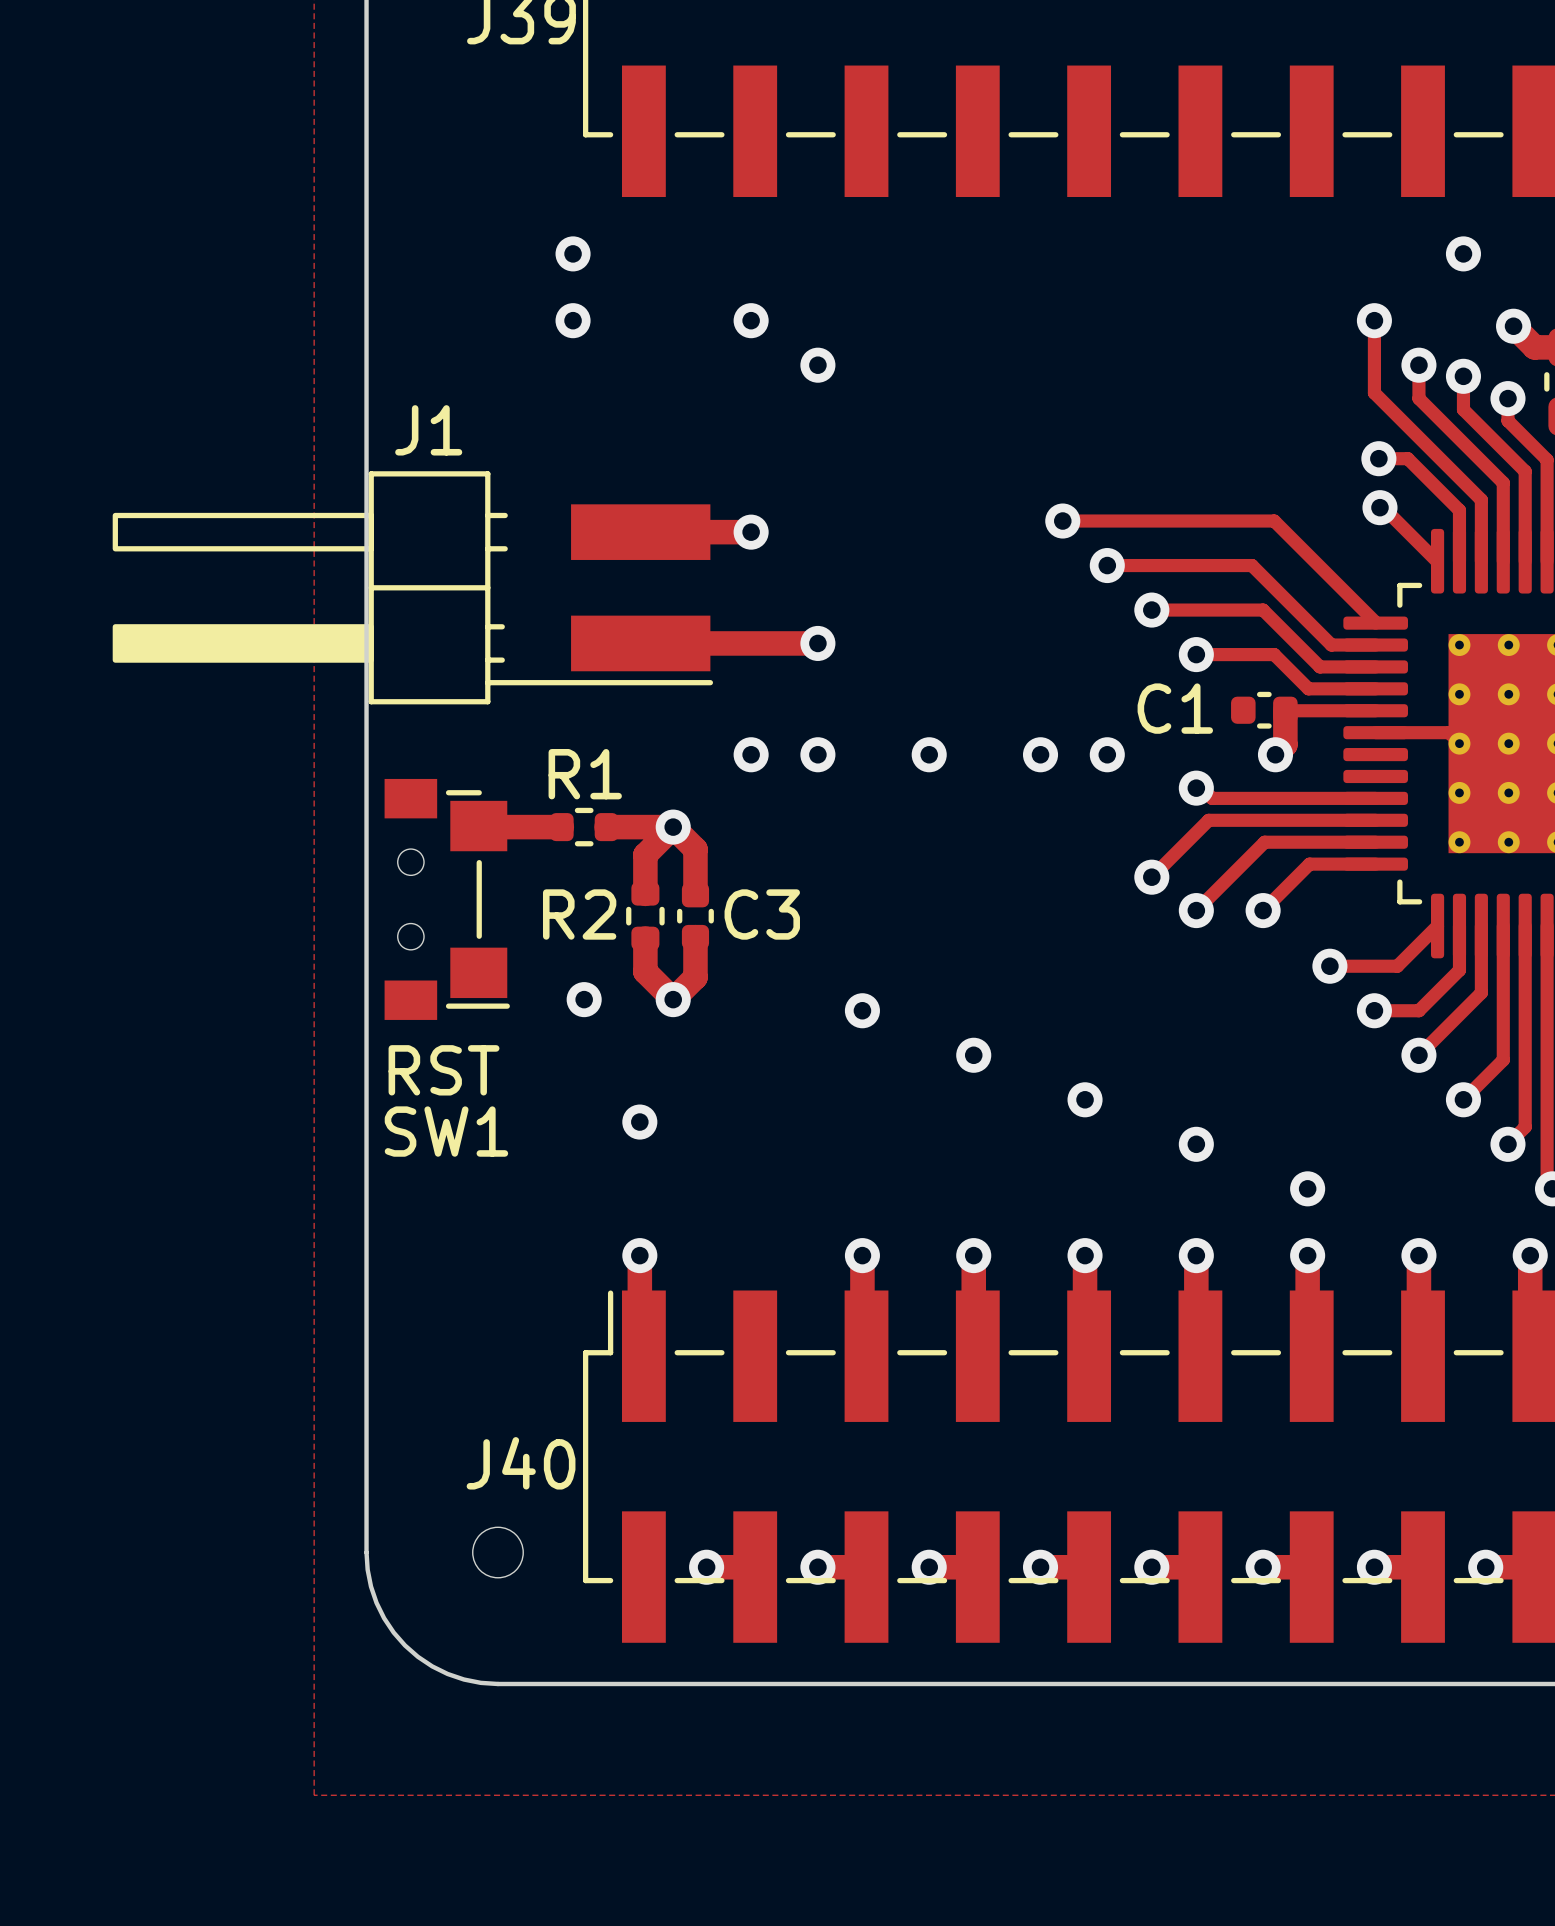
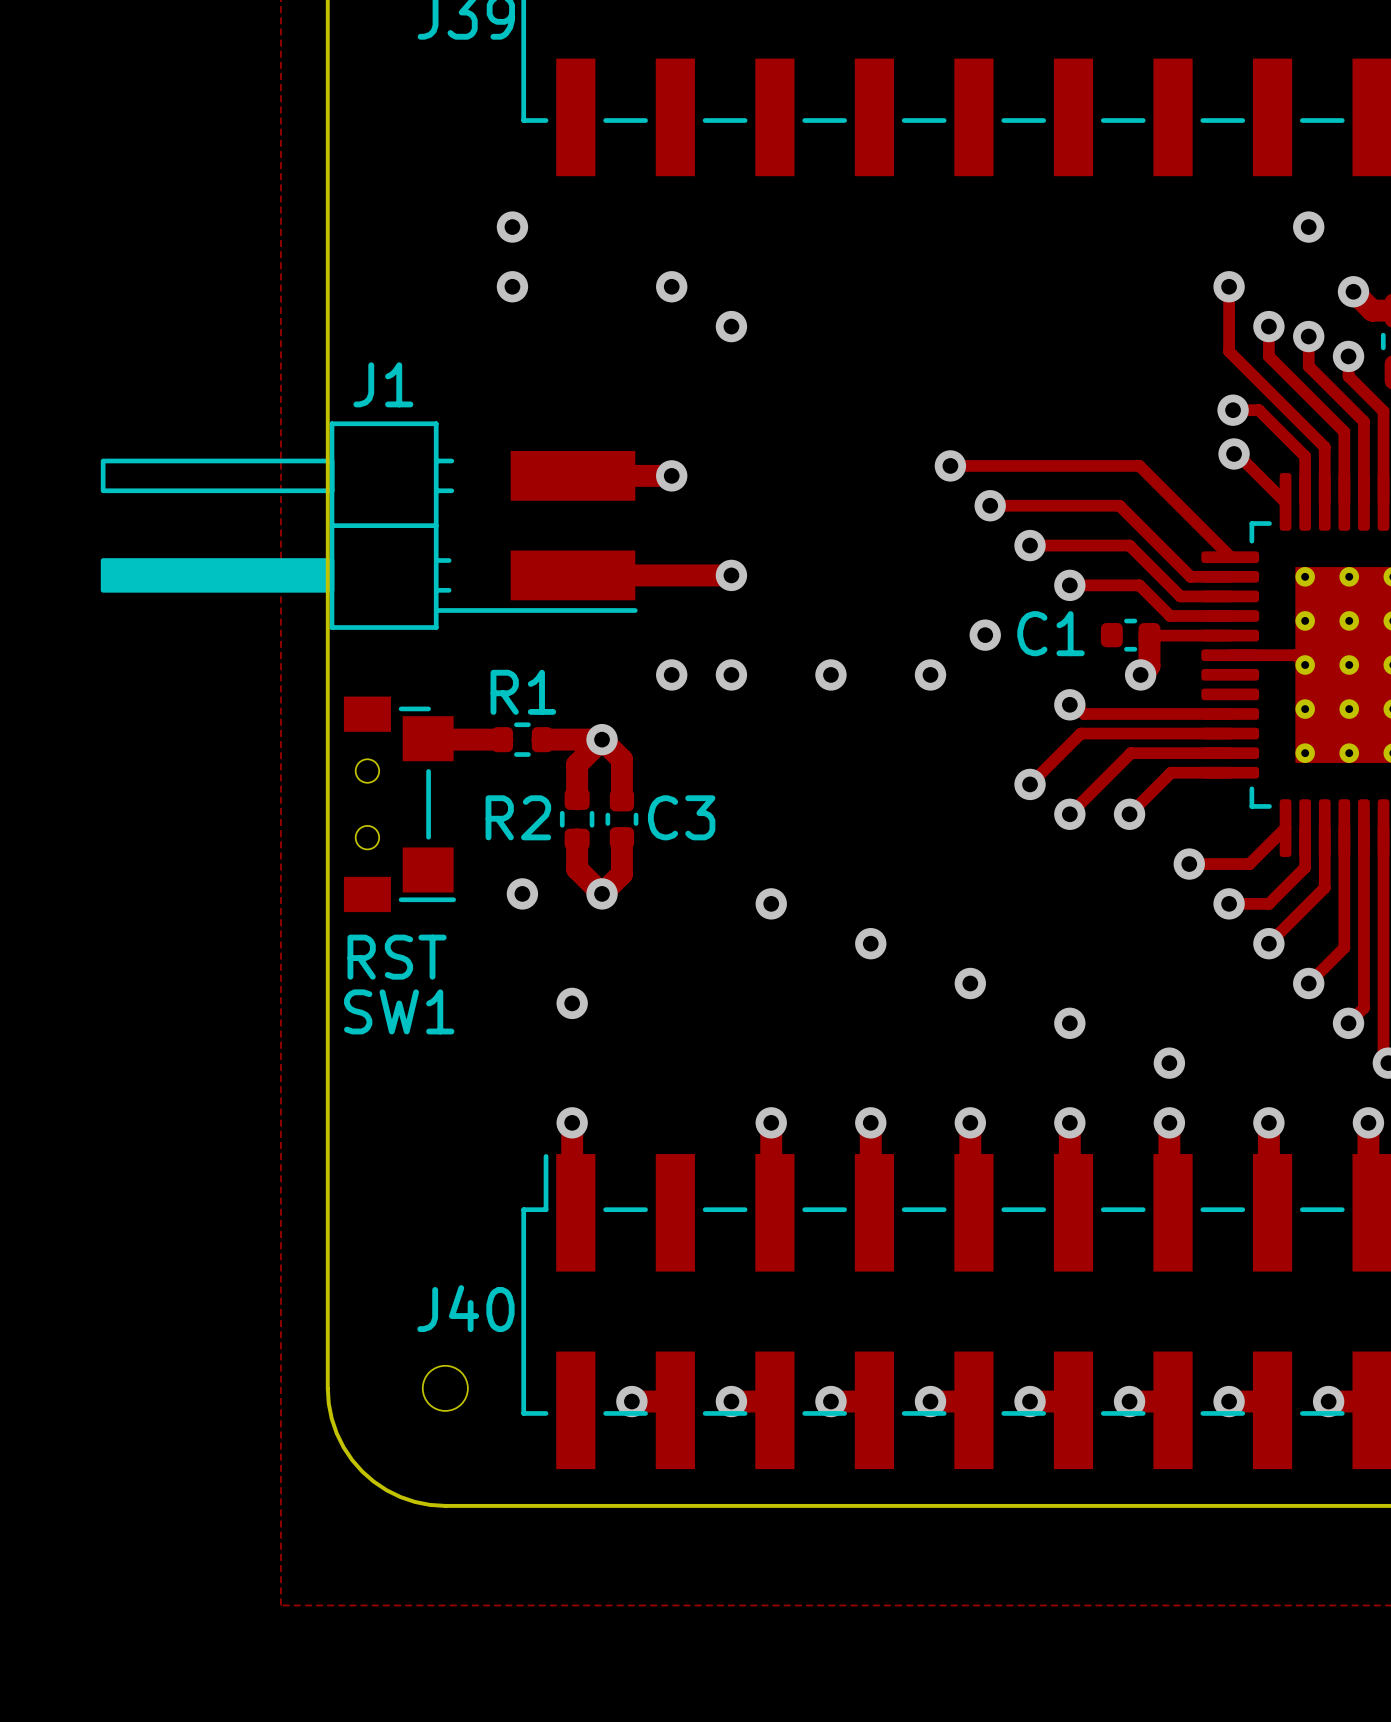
via position: (1107, 754) -> (985, 635)

